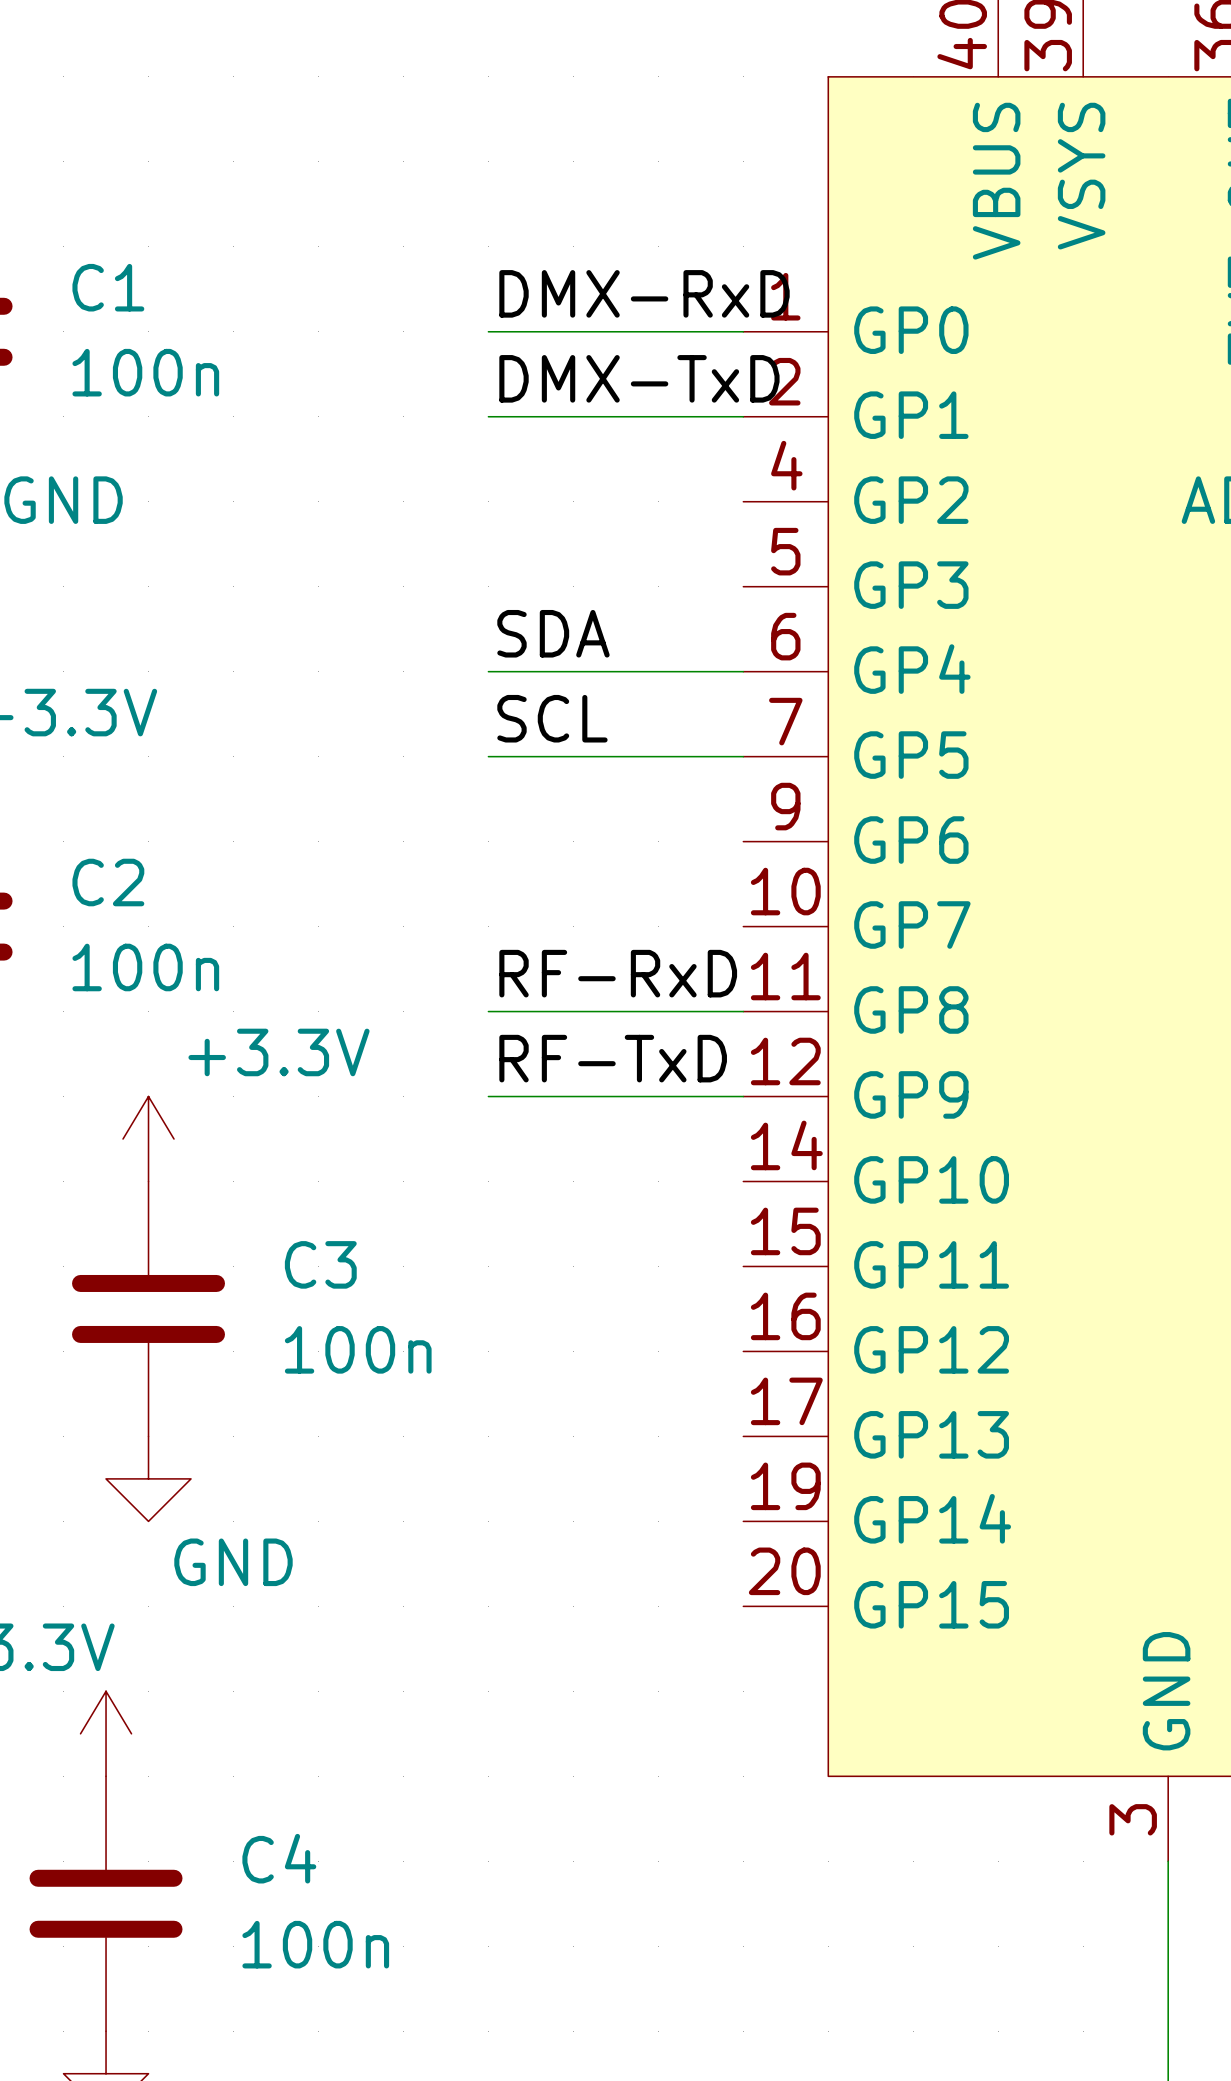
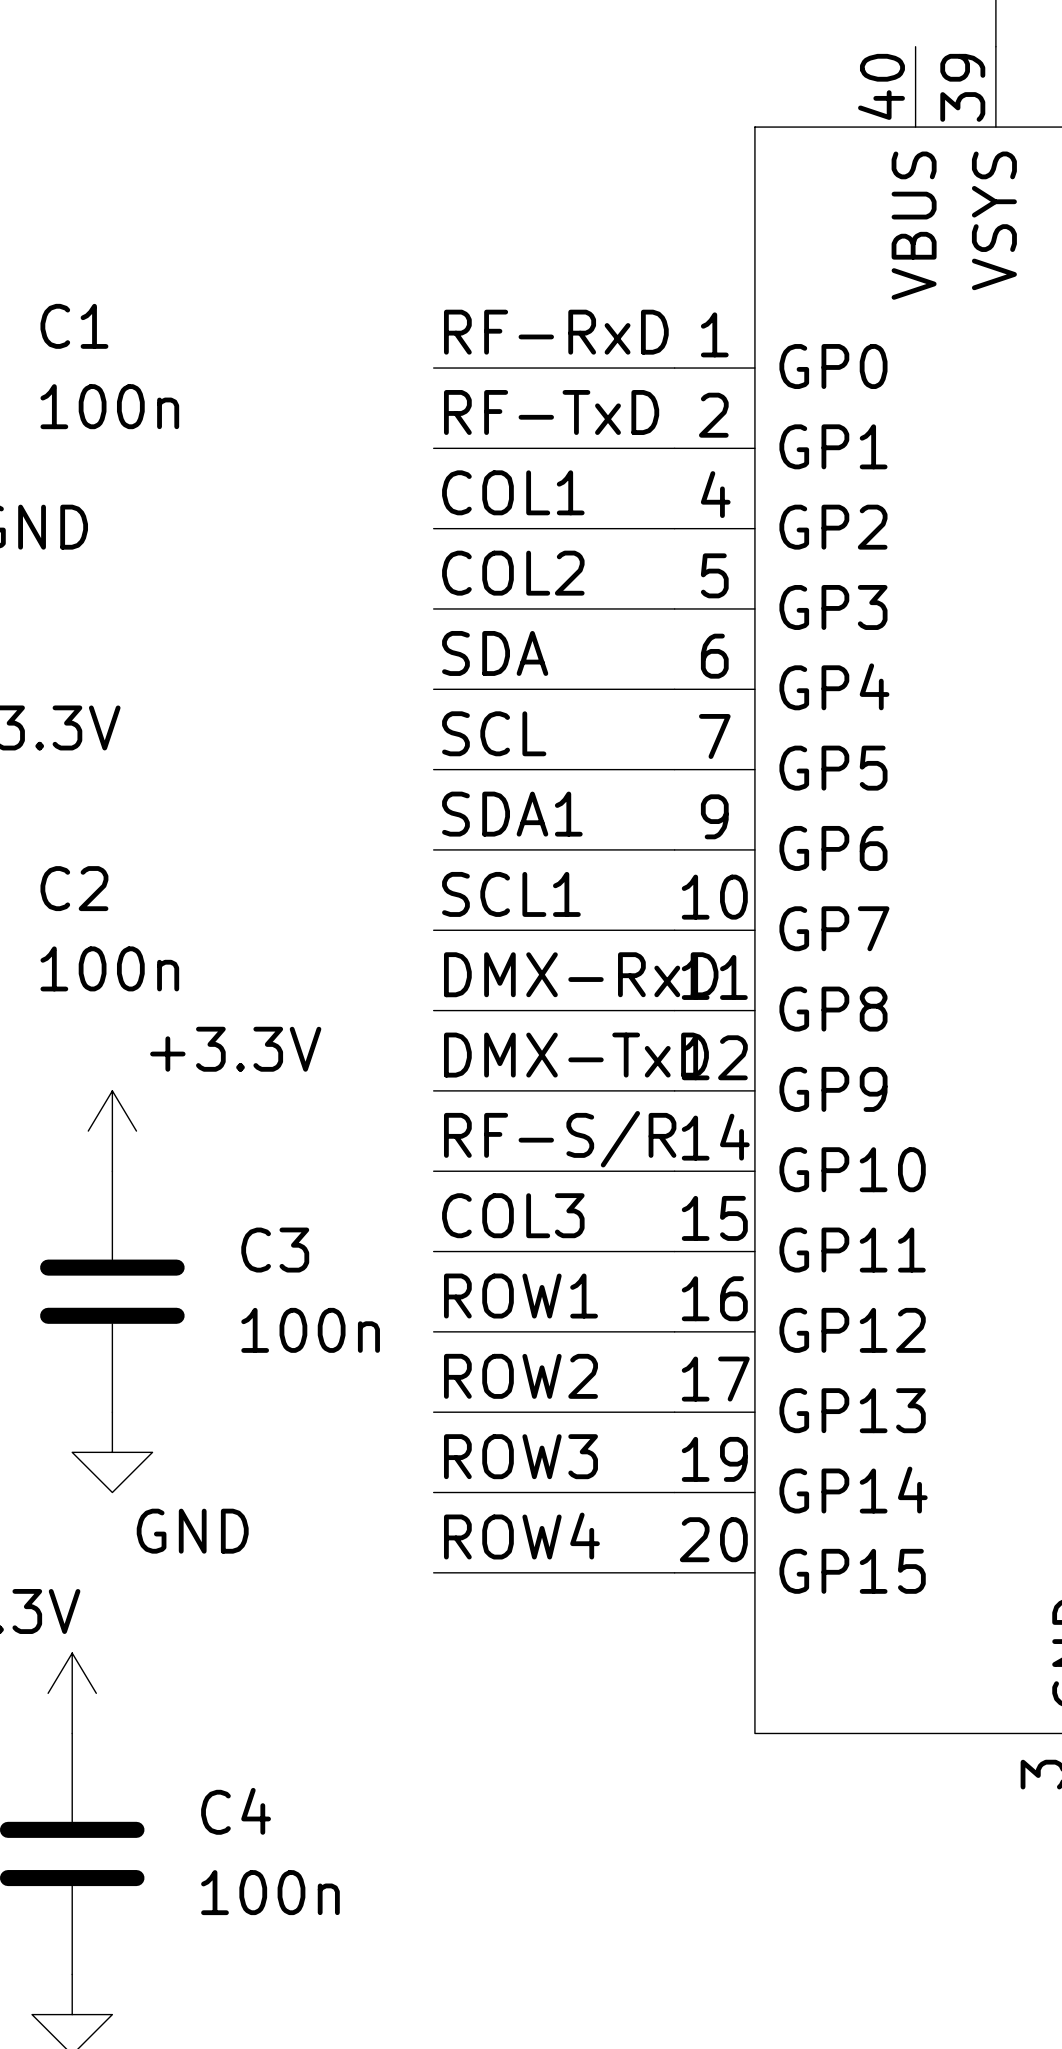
label: DMX-RxD (644, 293) -> RF-RxD (556, 332)
label: DMX-TxD (639, 378) -> RF-TxD (551, 412)
label: none -> COL1 (513, 492)
wire: none -> (433, 528) (674, 528)
label: none -> COL2 (513, 573)
wire: none -> (433, 608) (674, 608)
label: none -> SDA1 (512, 814)
wire: none -> (433, 849) (674, 849)
label: none -> SCL1 (511, 894)
wire: none -> (433, 930) (674, 930)
label: RF-RxD (618, 973) -> DMX-RxD (581, 974)
label: RF-TxD (613, 1058) -> DMX-TxD (576, 1055)
label: none -> RF-S/R (560, 1139)
wire: none -> (433, 1171) (674, 1171)
label: none -> COL3 (513, 1215)
wire: none -> (433, 1251) (674, 1251)
label: none -> ROW1 (520, 1296)
wire: none -> (433, 1331) (674, 1331)
label: none -> ROW2 (520, 1376)
wire: none -> (433, 1412) (674, 1412)
label: none -> ROW3 (520, 1456)
wire: none -> (433, 1492) (674, 1492)
label: none -> ROW4 (521, 1536)
wire: none -> (433, 1572) (674, 1572)

